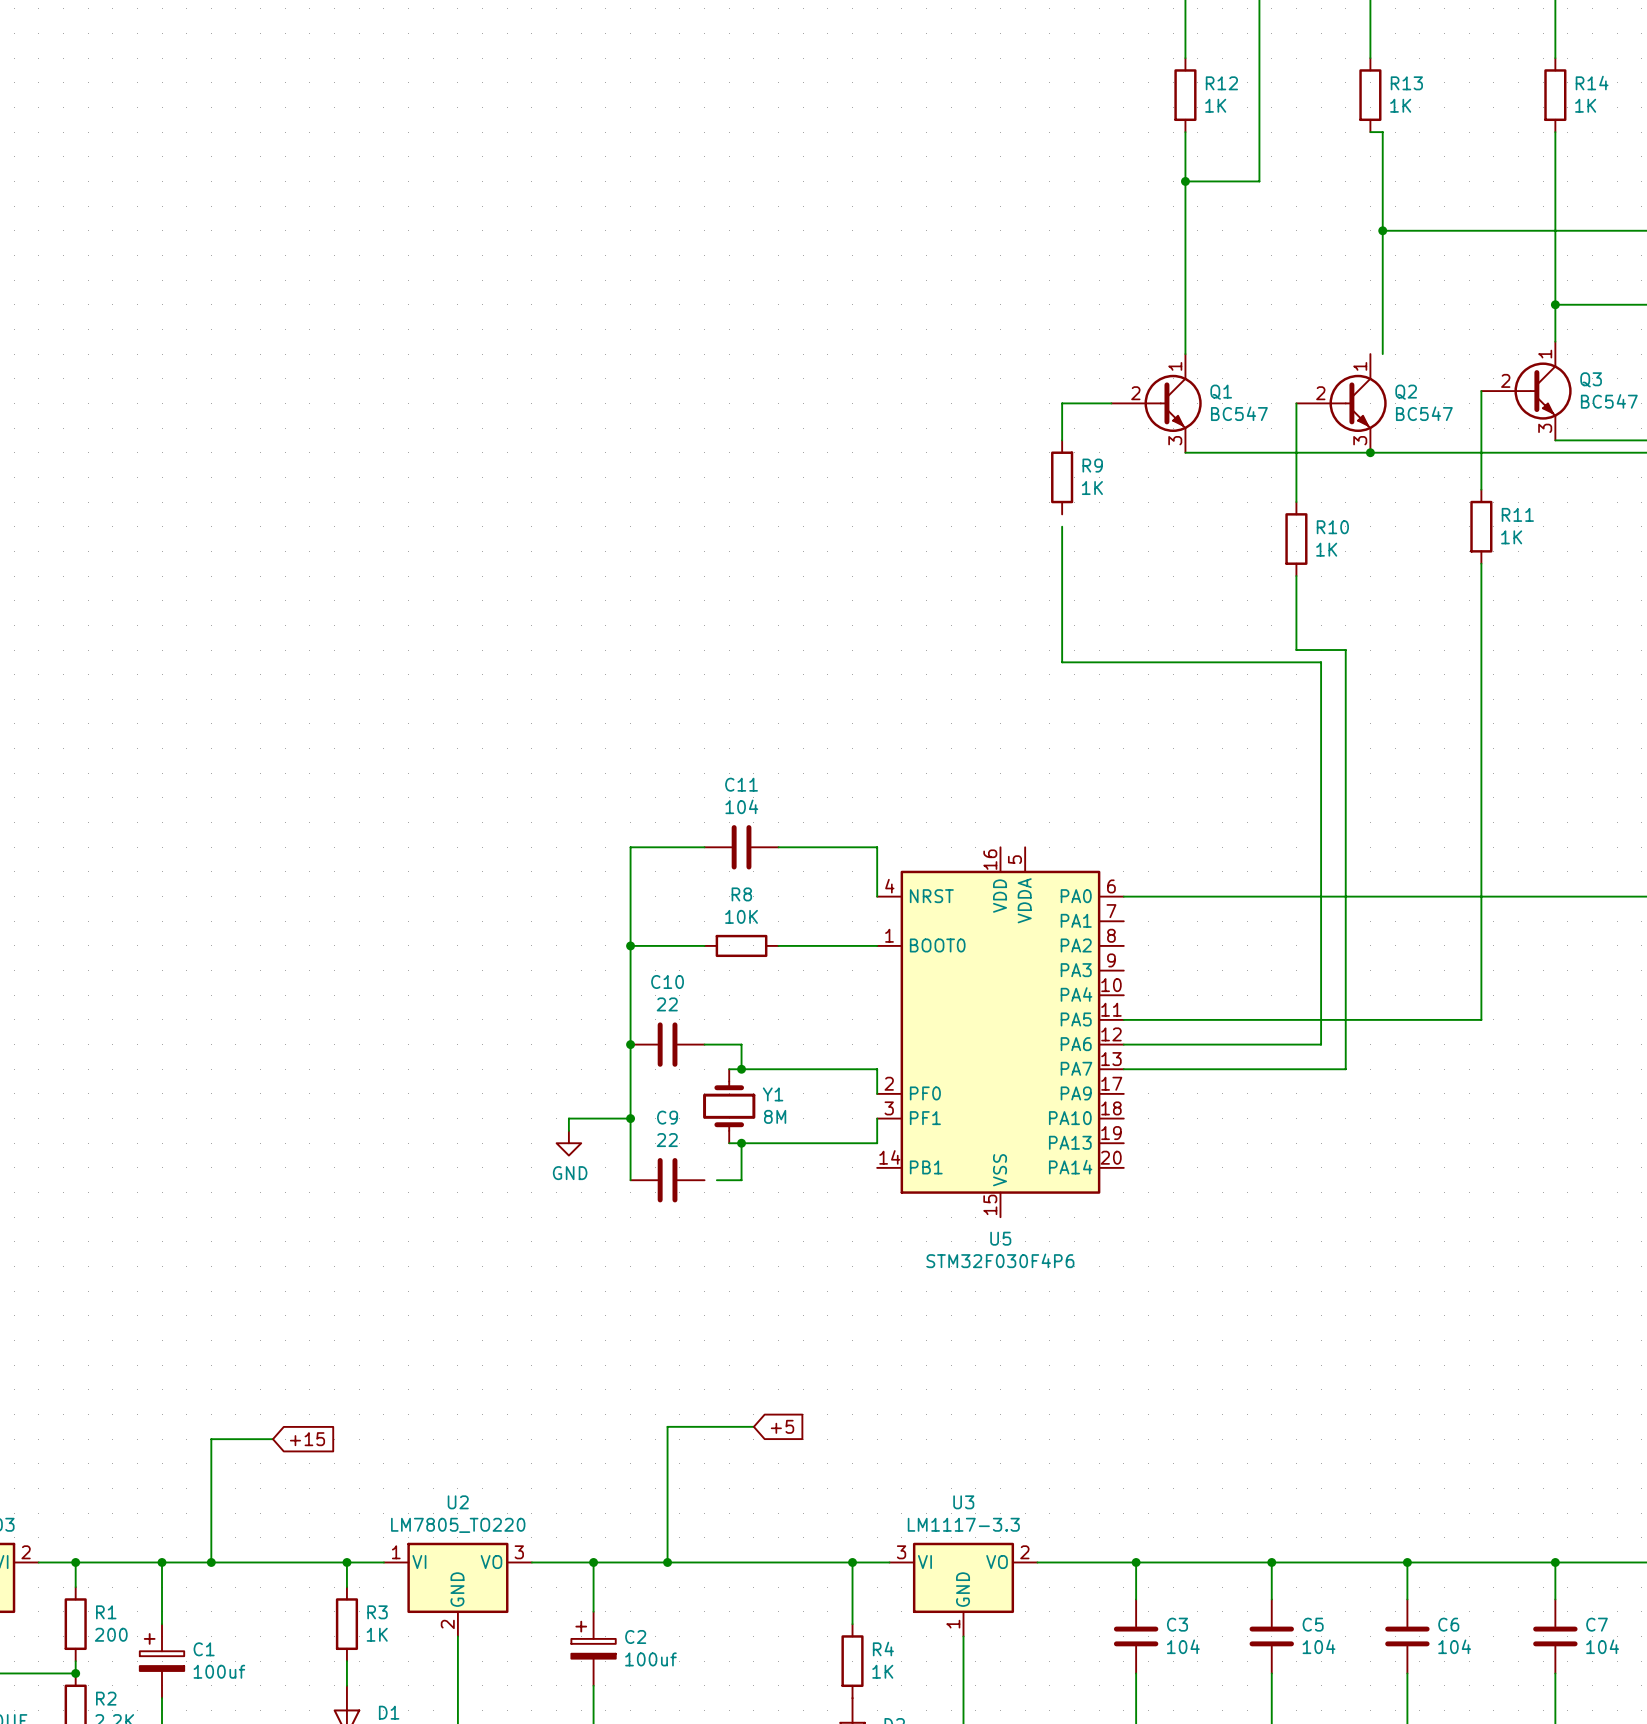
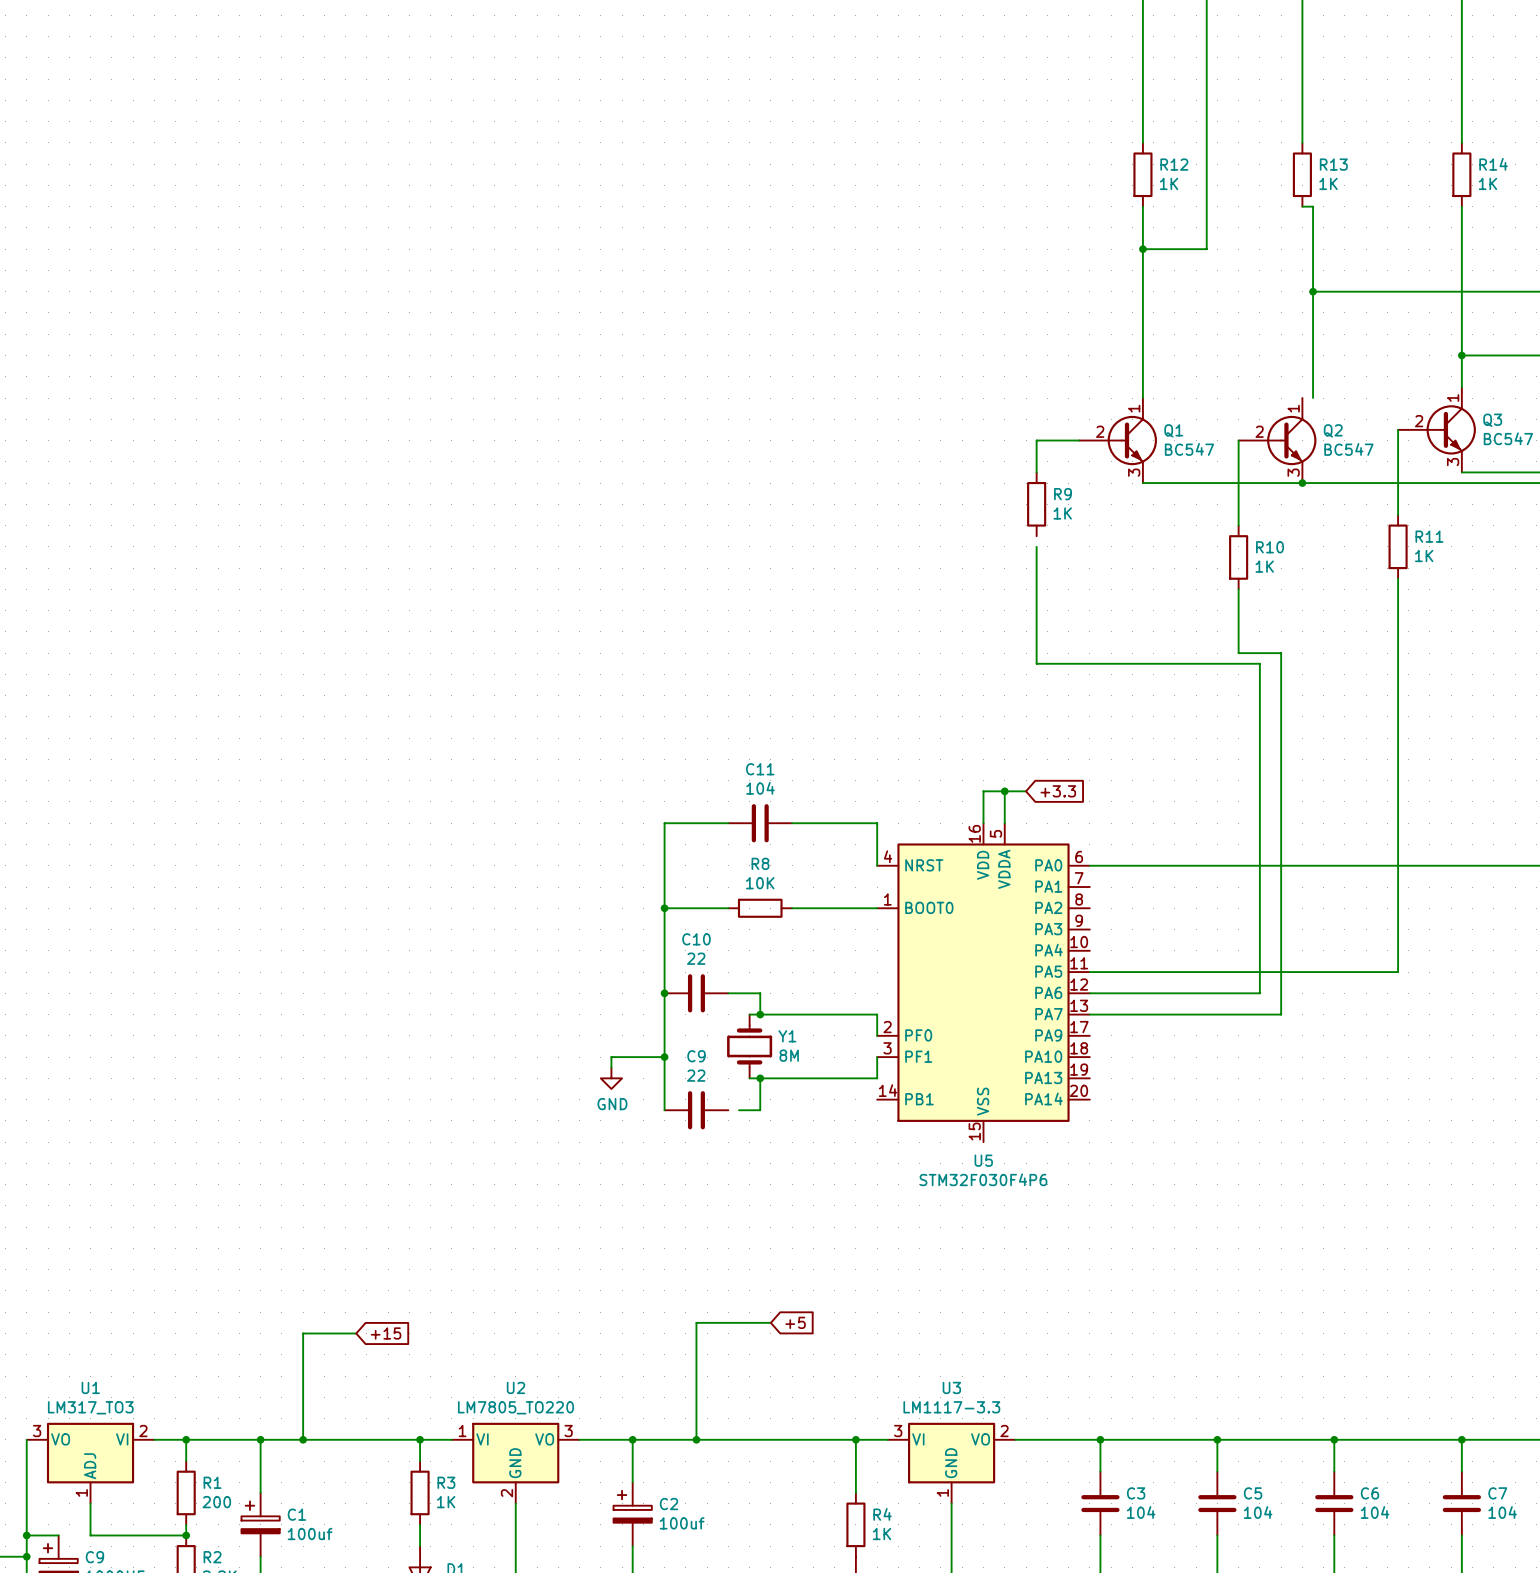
wire: none -> (1004, 791) (1004, 823)
junction: none -> (1004, 791)
wire: none -> (1026, 791) (983, 791) (983, 823)
global label: none -> +3.3 (1058, 791)

